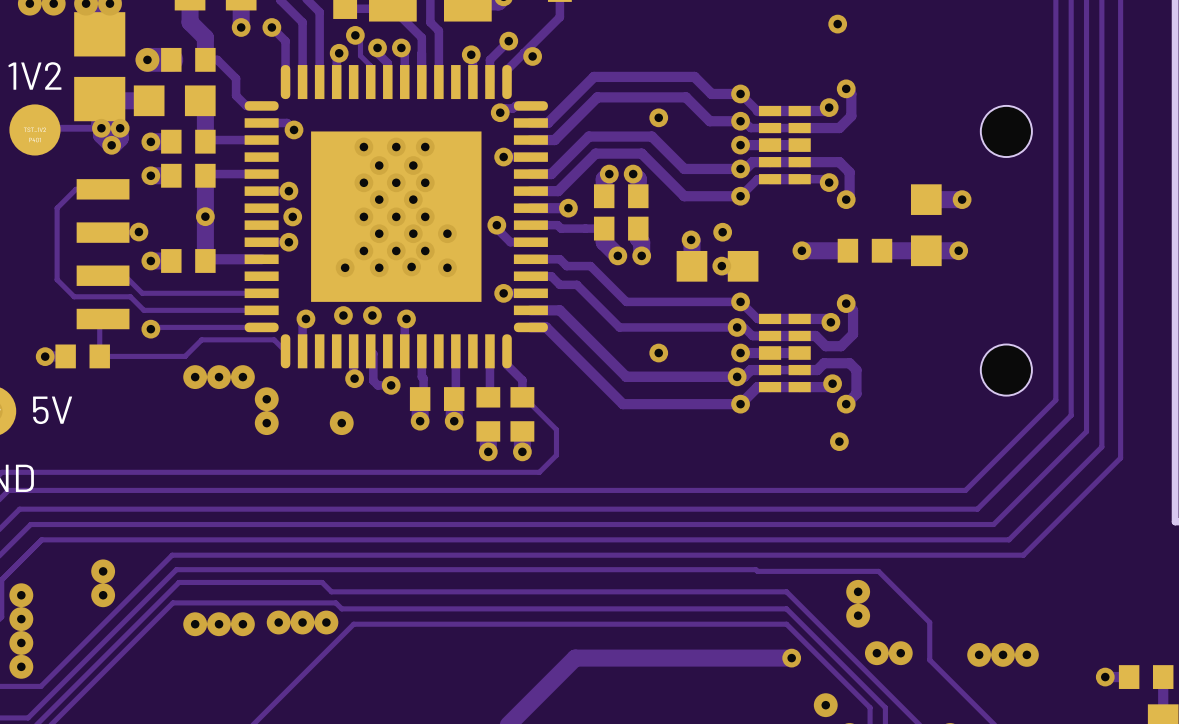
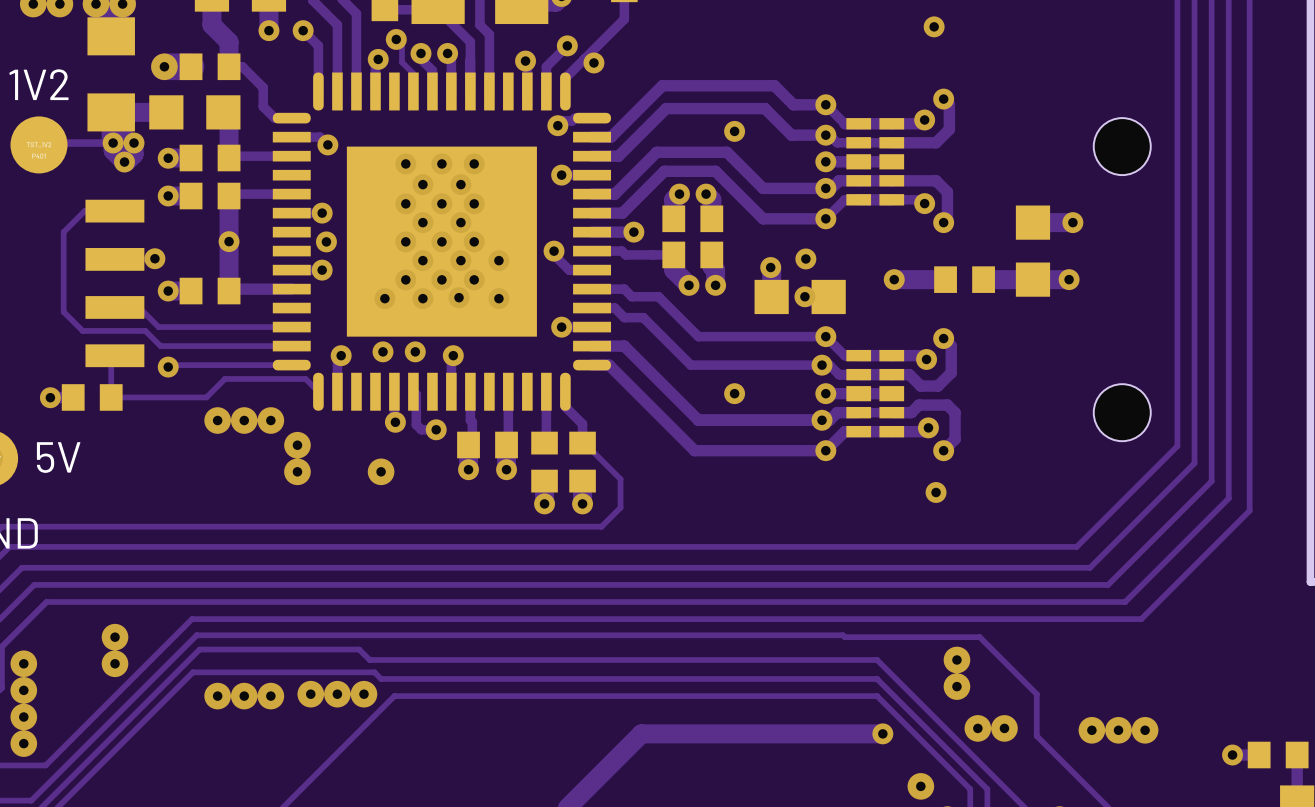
part footprint: [74, 12, 126, 122] -> [87, 17, 135, 132]

